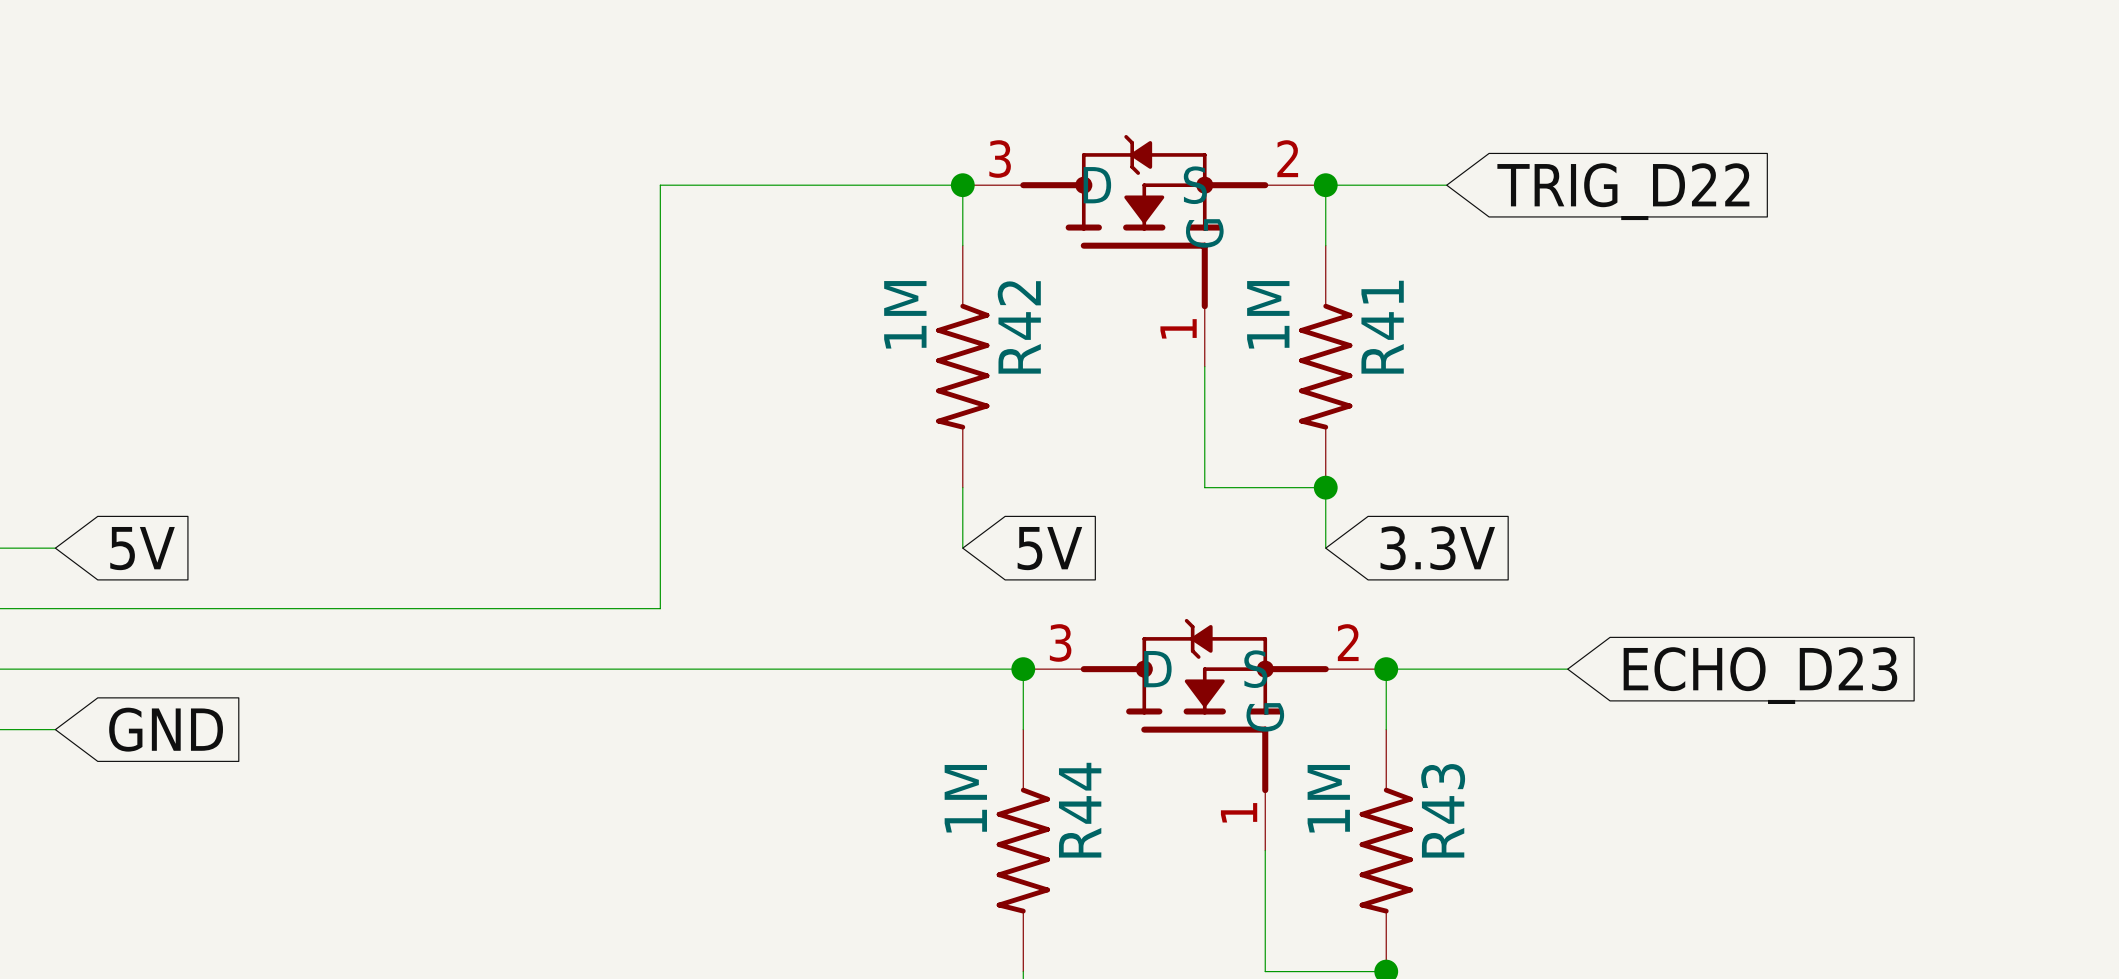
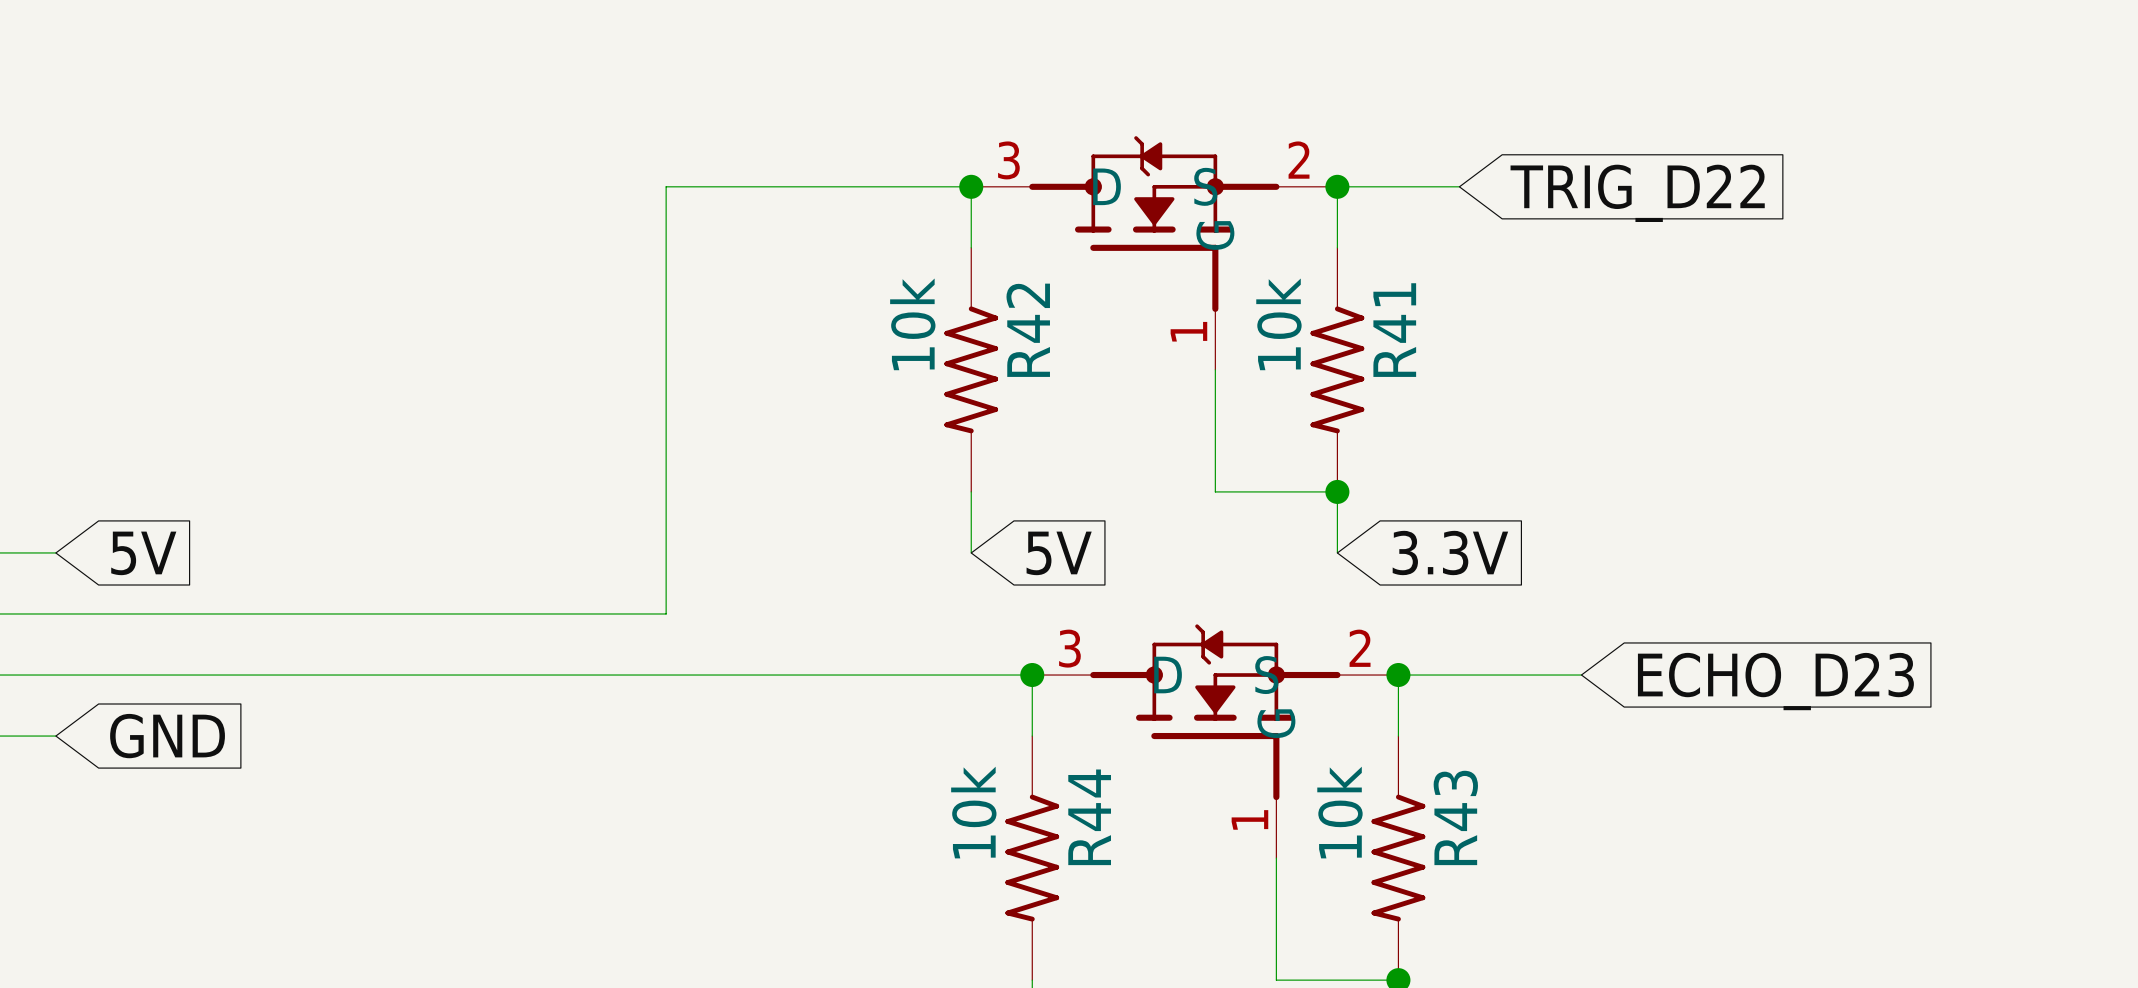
R42 value: 1M (905, 314) -> 10k (912, 324)
R41 value: 1M (1268, 314) -> 10k (1278, 324)
R44 value: 1M (965, 798) -> 10k (973, 812)
R43 value: 1M (1328, 798) -> 10k (1339, 812)

